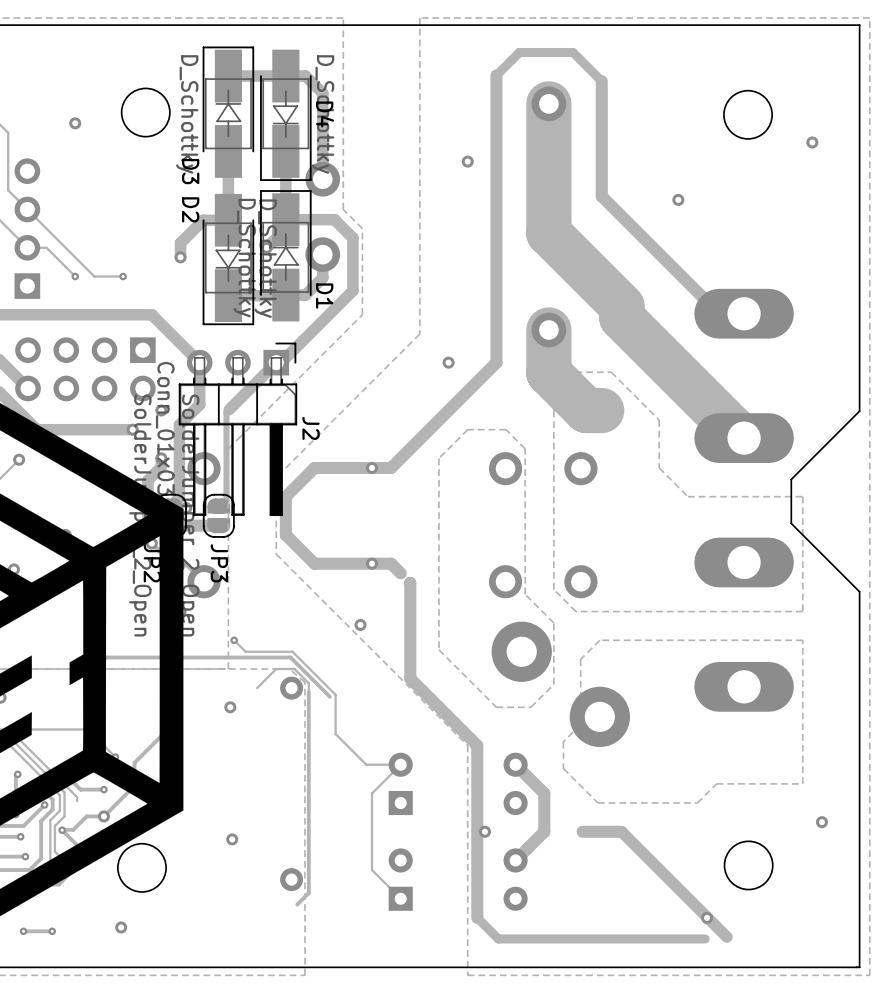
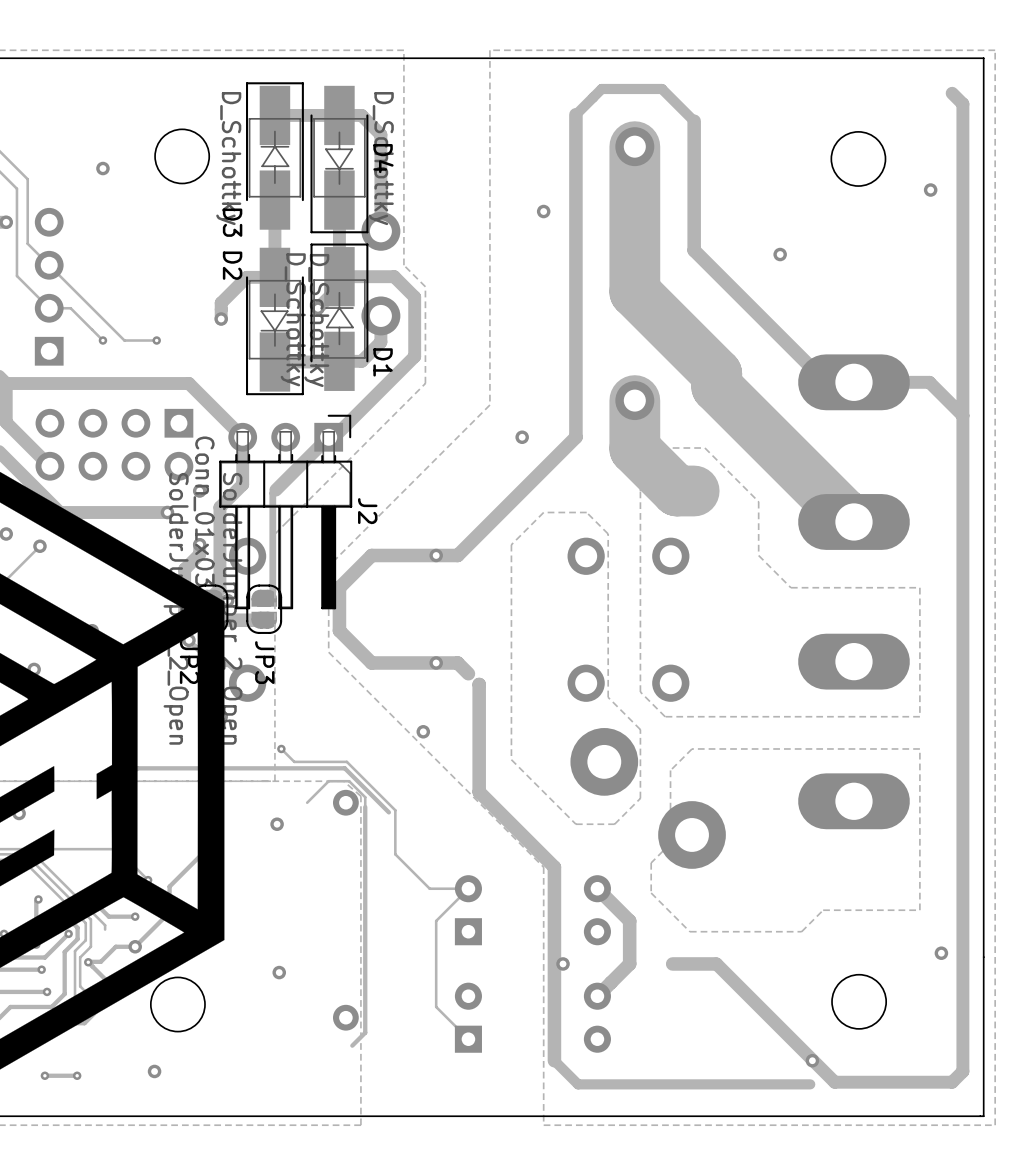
track: none -> (952, 93) (962, 104) (962, 1071) (952, 1082) (834, 1082)
track: none -> (853, 382) (929, 382) (962, 415)
board edge: (859, 411) (791, 479) (791, 523) (859, 591) -> (983, 491) (983, 694)

